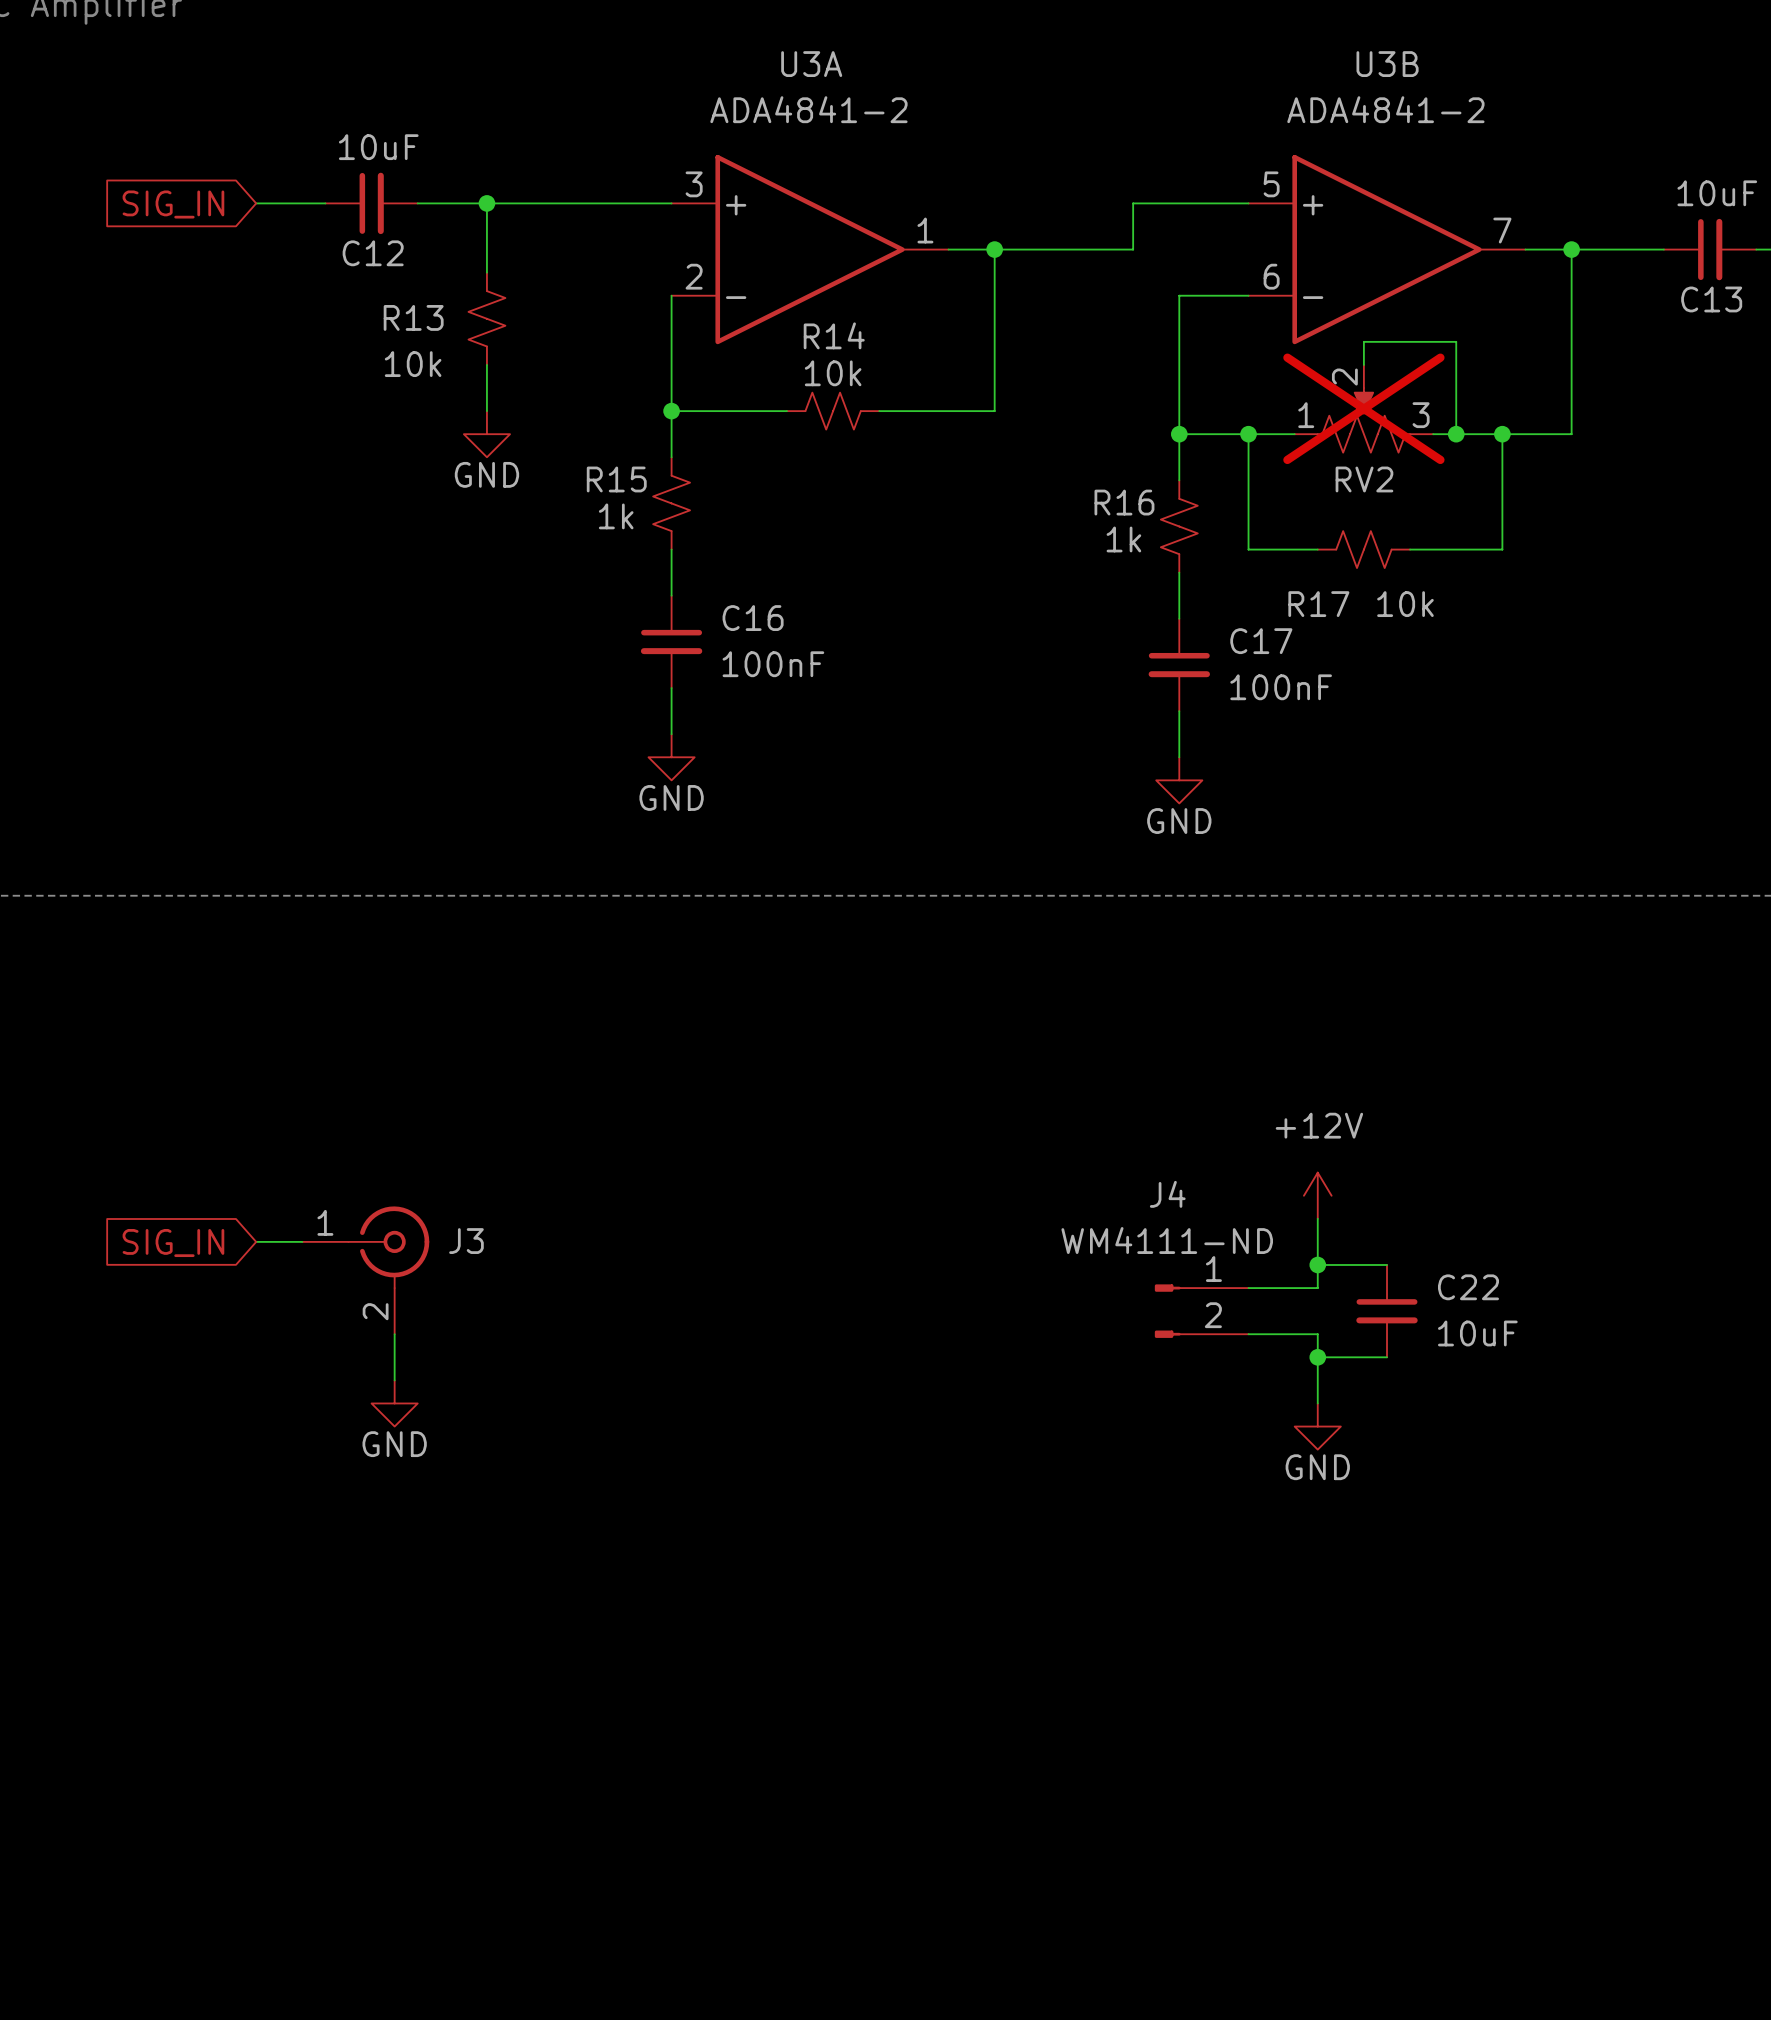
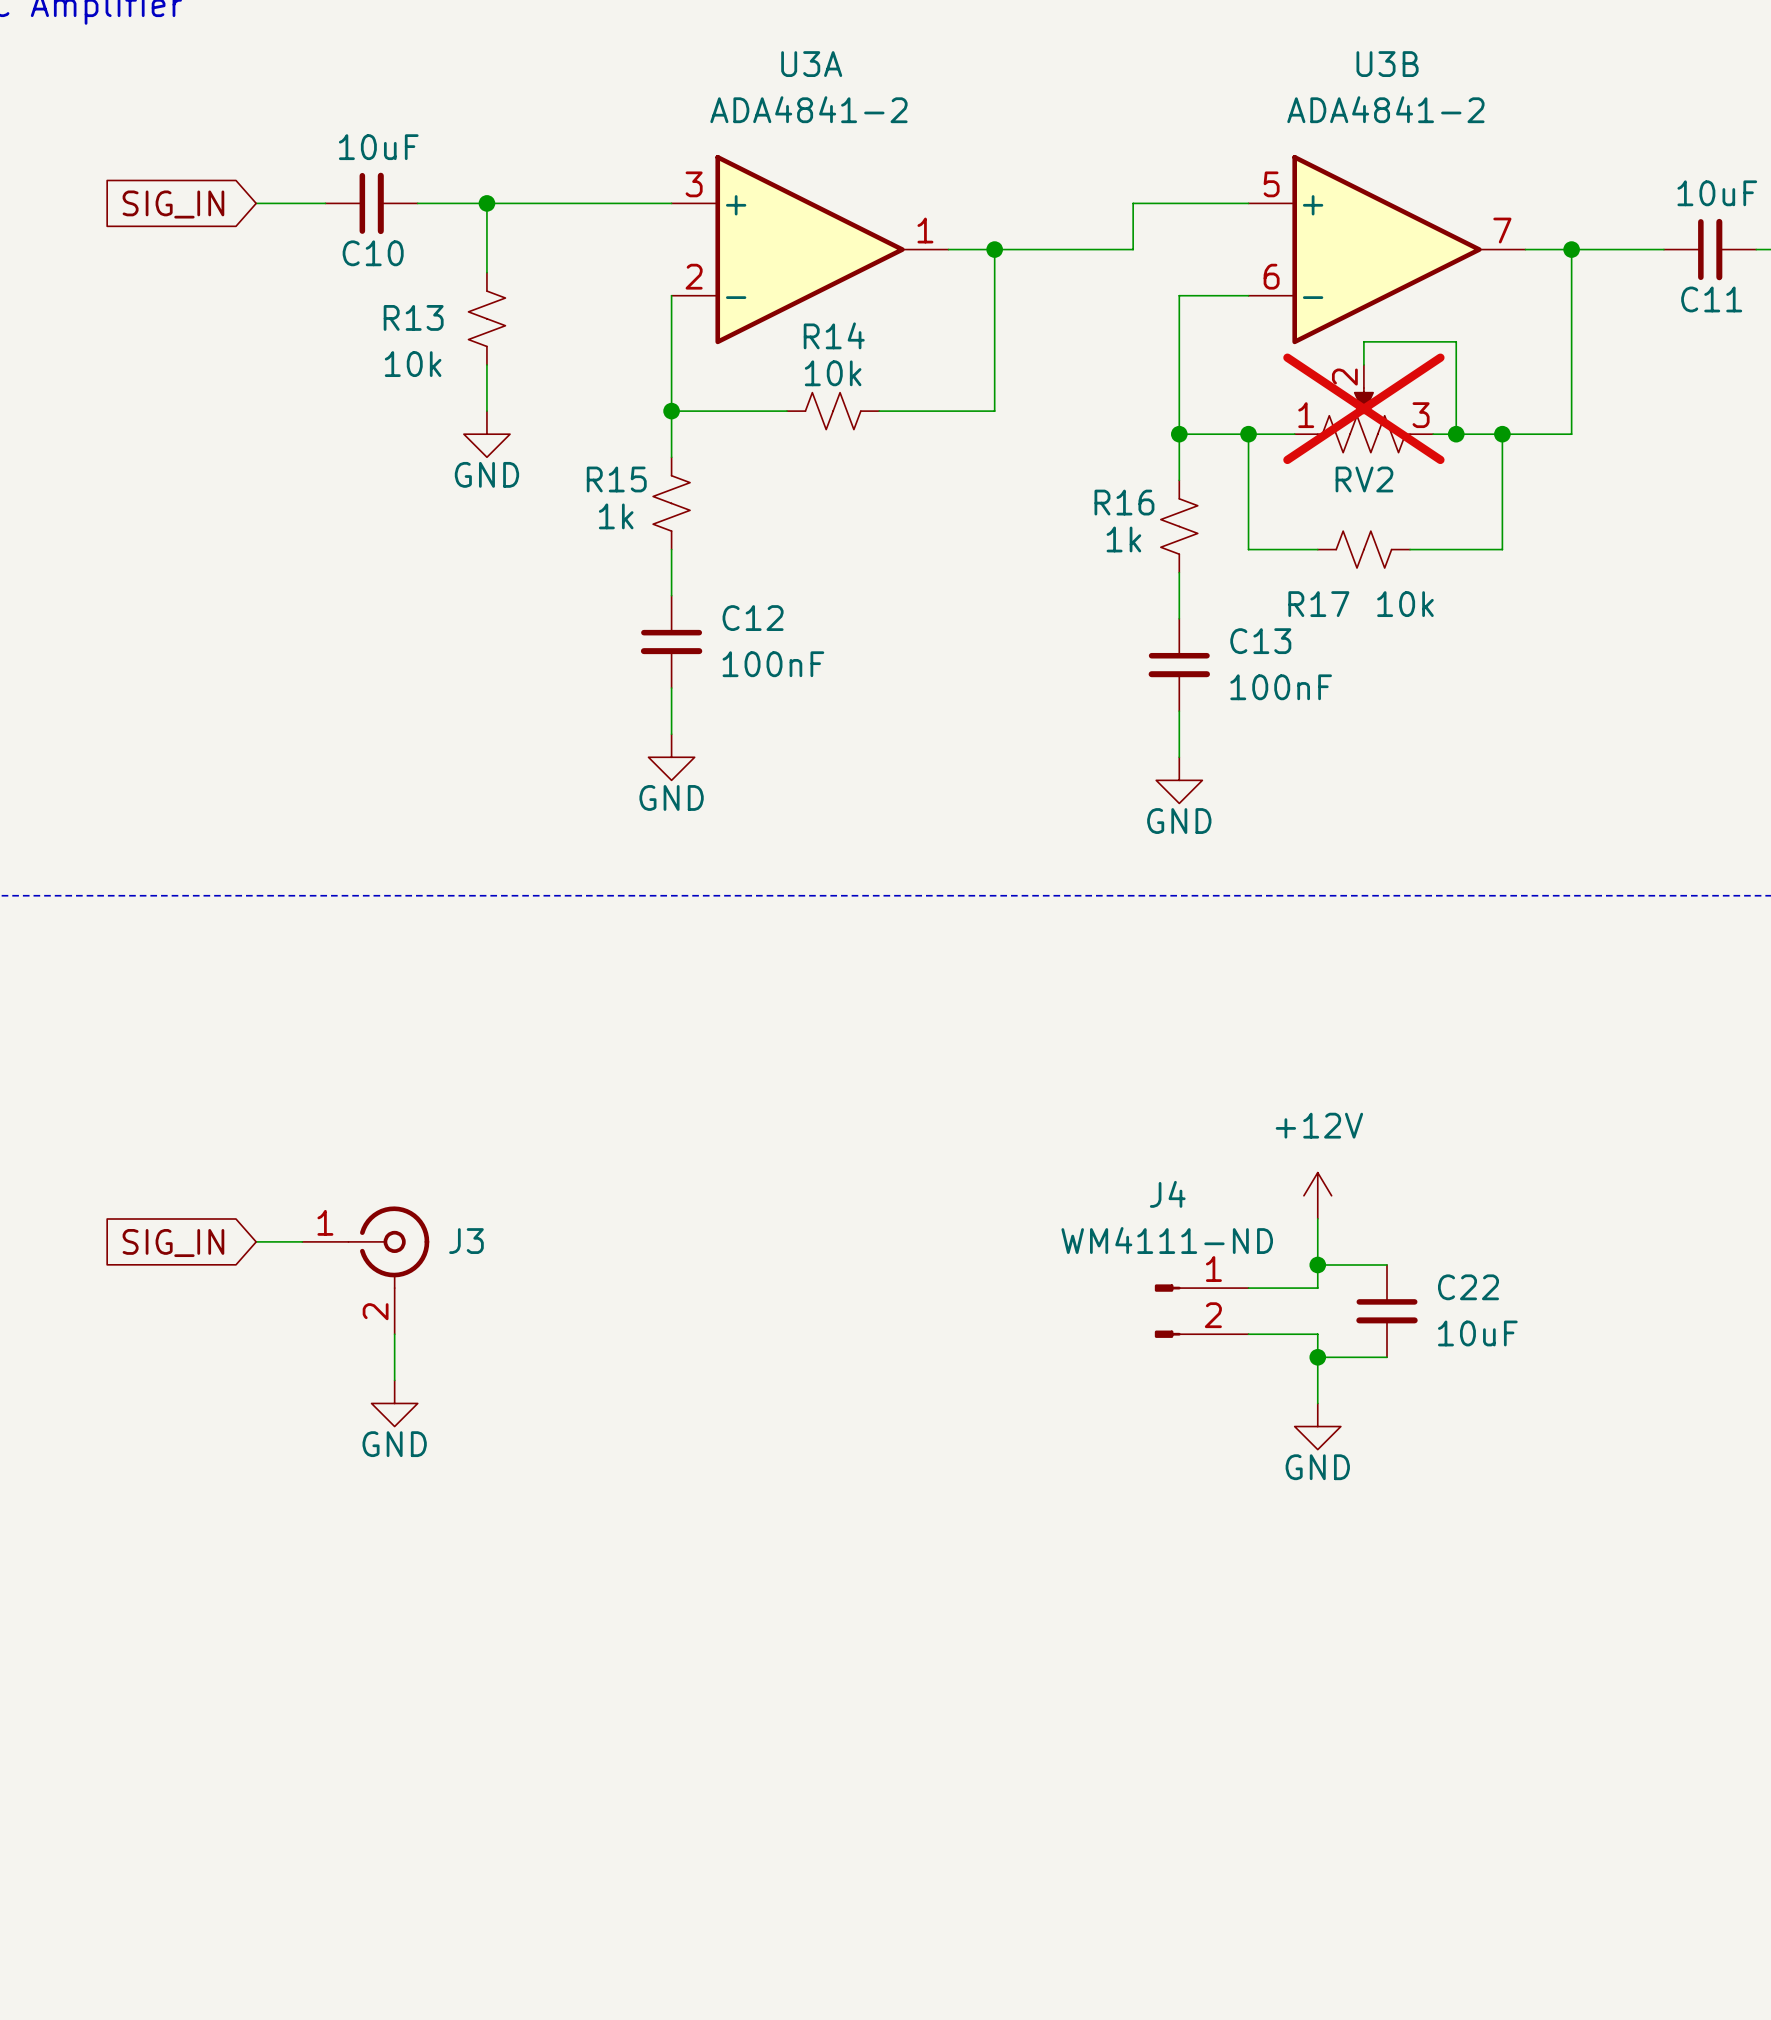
C12 name: C12 (373, 253) -> C10 (373, 253)
C13 name: C13 (1711, 299) -> C11 (1711, 299)
C16 name: C16 (753, 618) -> C12 (753, 618)
C17 name: C17 (1261, 641) -> C13 (1260, 641)

